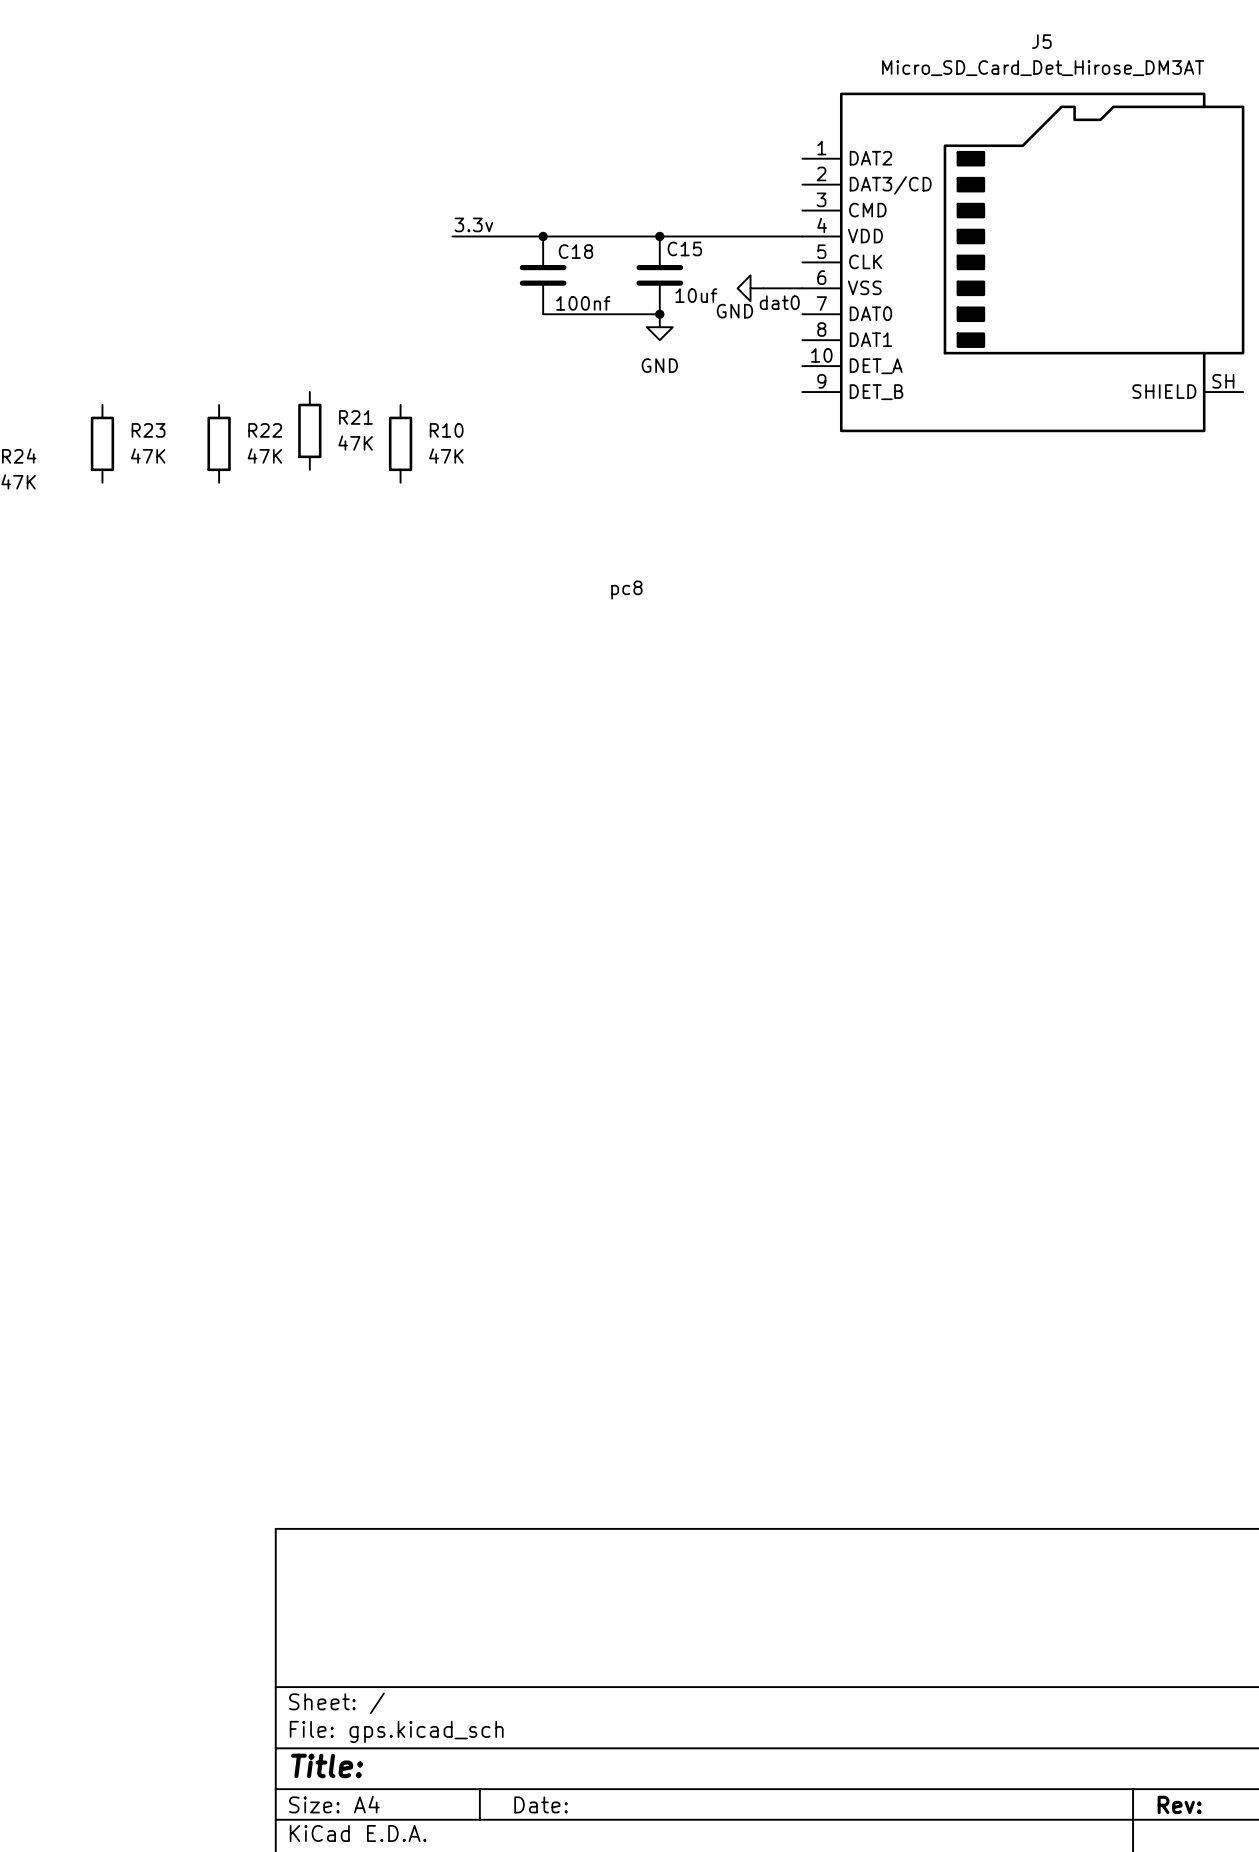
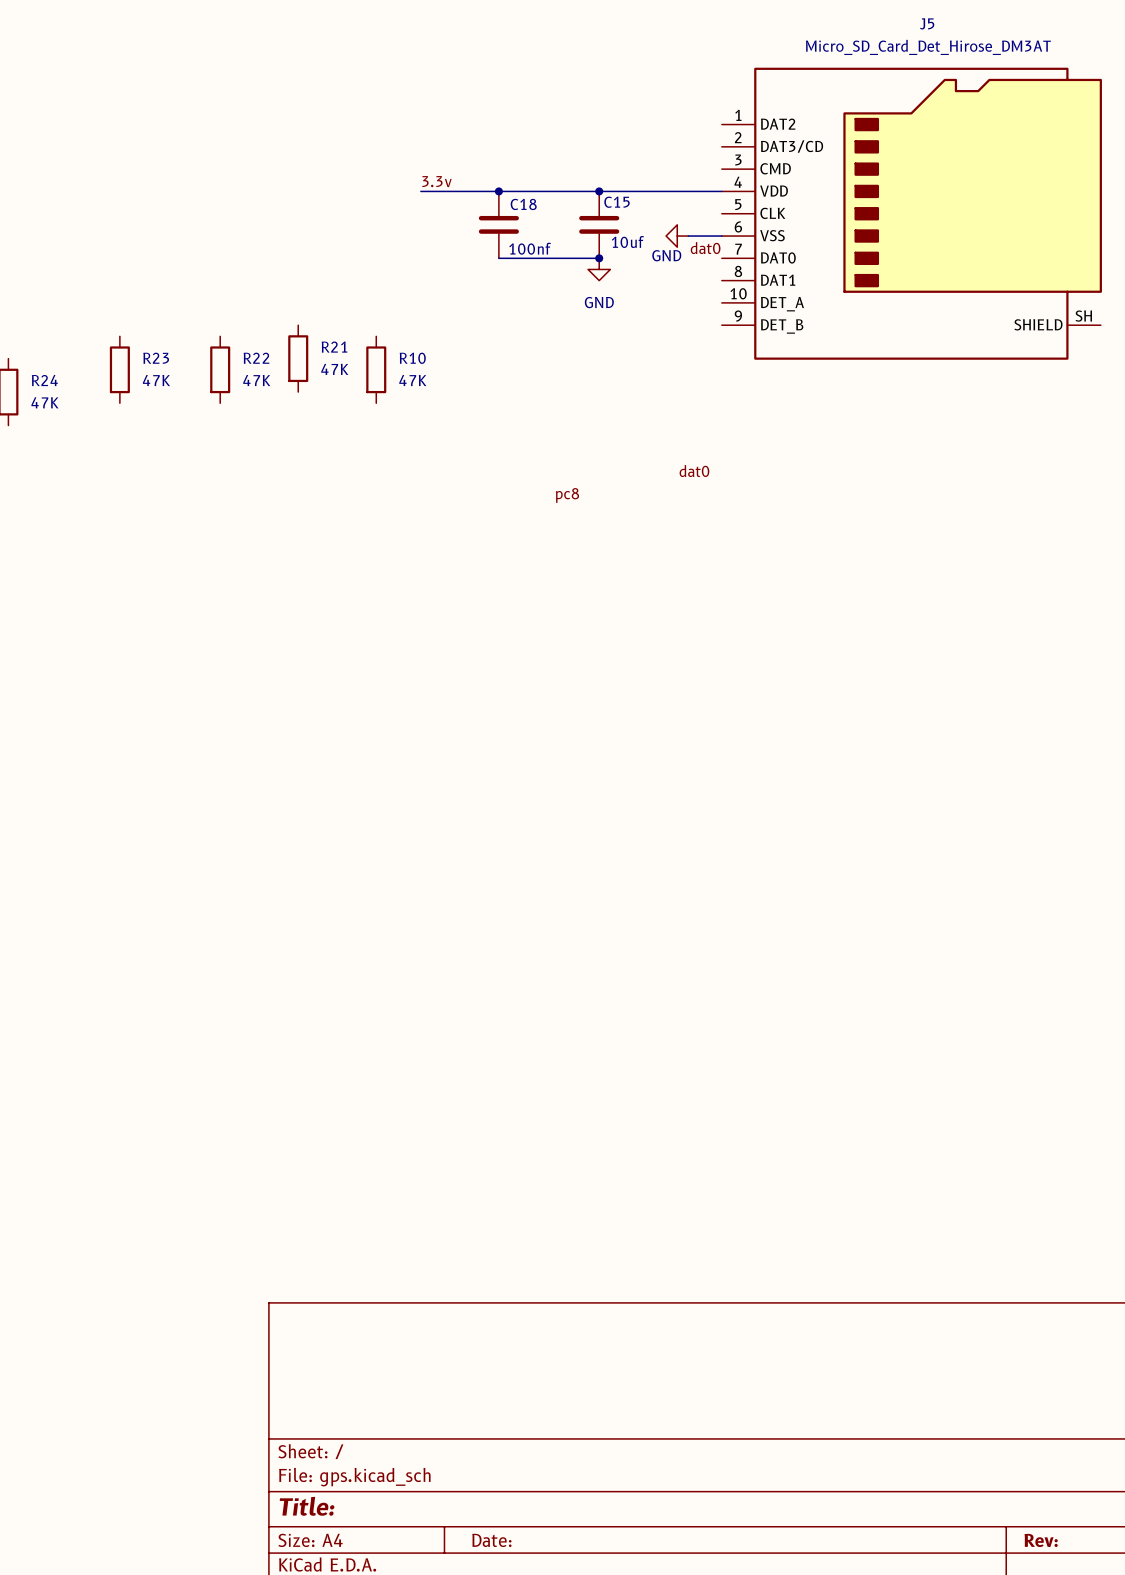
label: none -> dat0 (694, 471)

